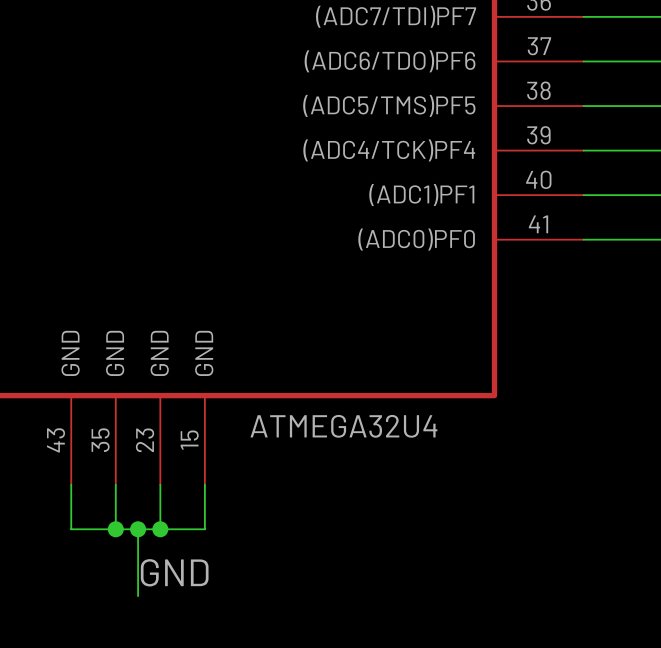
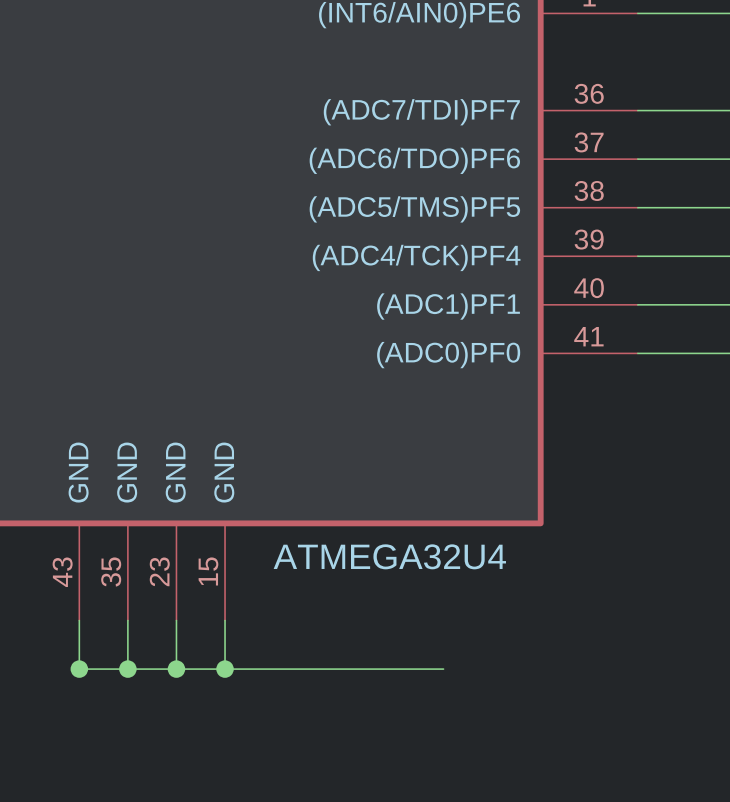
junction: none -> (79, 669)
wire: (138, 529) (138, 596) -> none
junction: (138, 529) -> none
wire: none -> (225, 669) (443, 669)
junction: none -> (225, 669)
label: GND (174, 572) -> none

